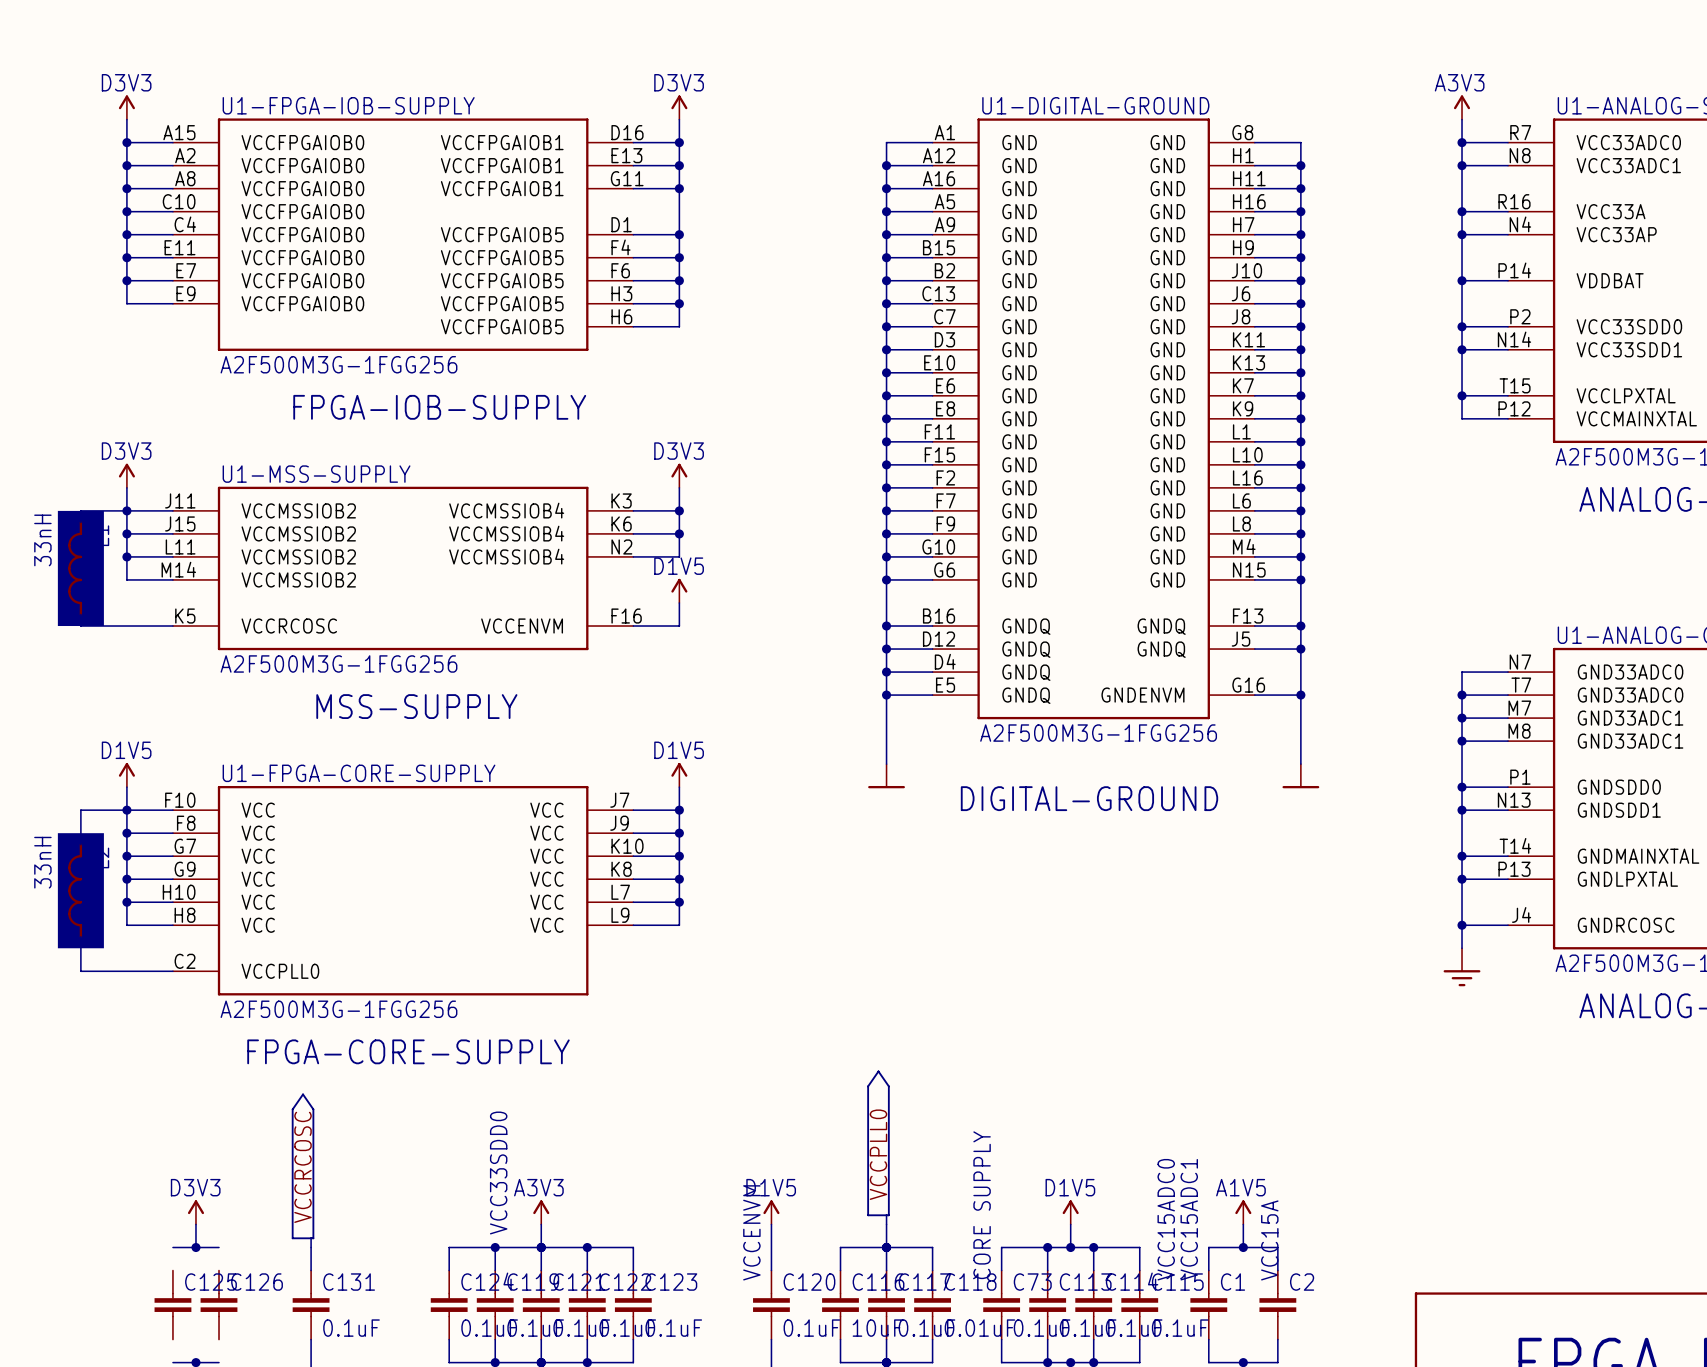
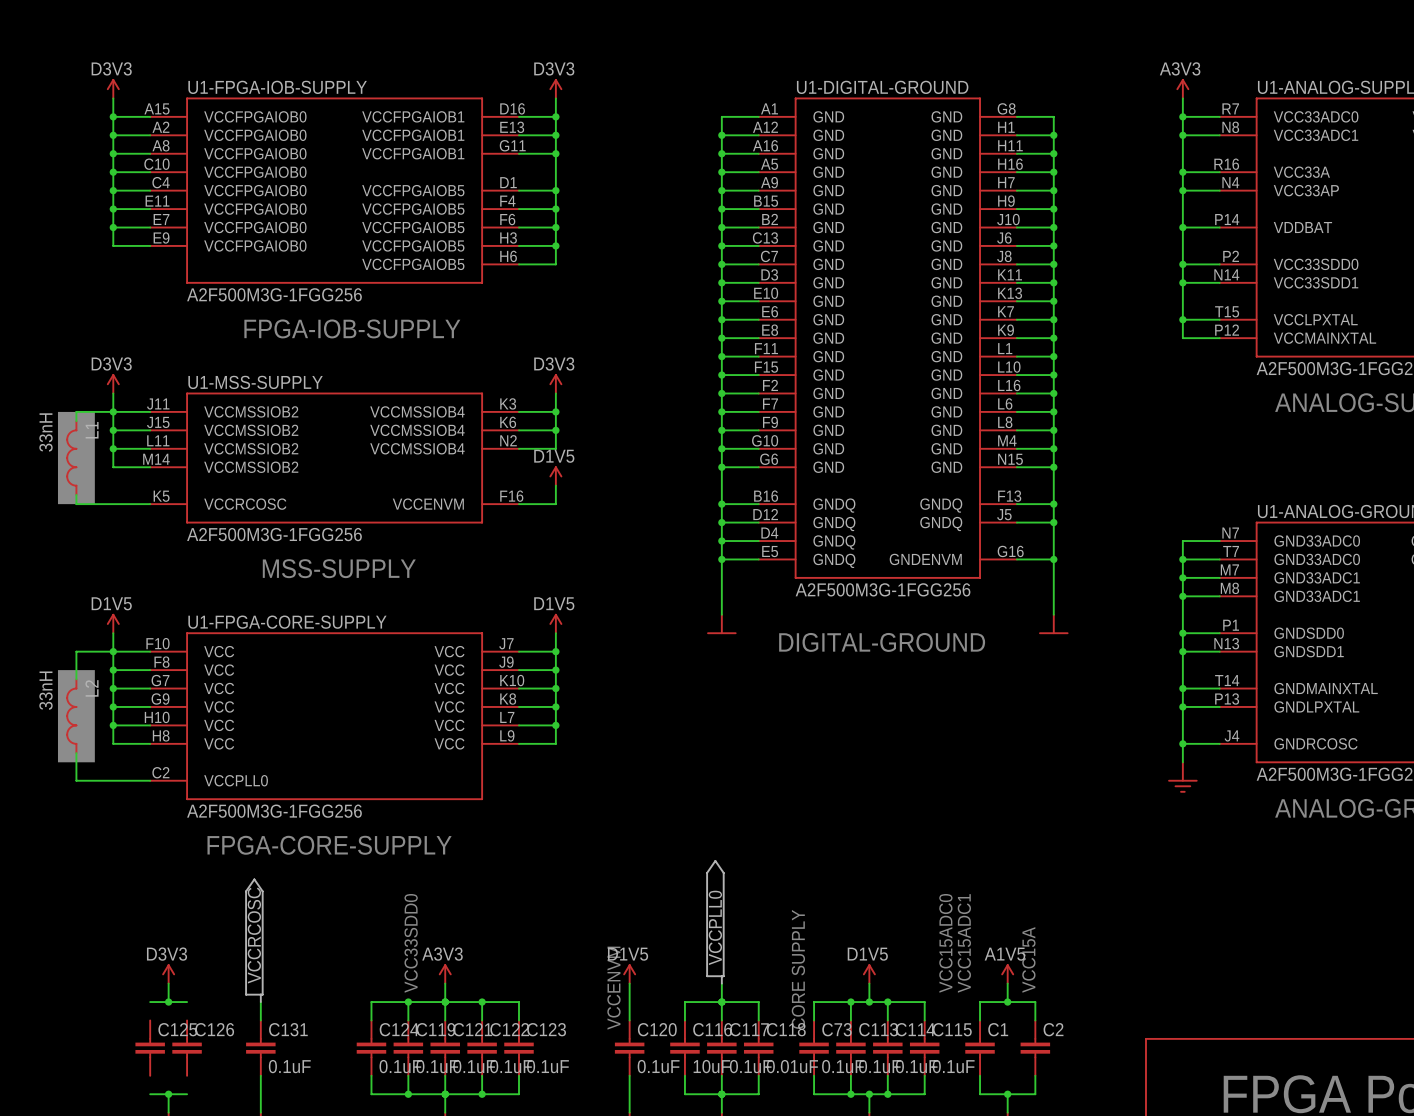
text position: VCC15ADC0 (1166, 1219) -> VCC15ADC0 (945, 943)
text position: VCC15ADC1 (1189, 1219) -> VCC15ADC1 (964, 943)
text position: VCC15A (1269, 1240) -> VCC15A (1028, 959)

